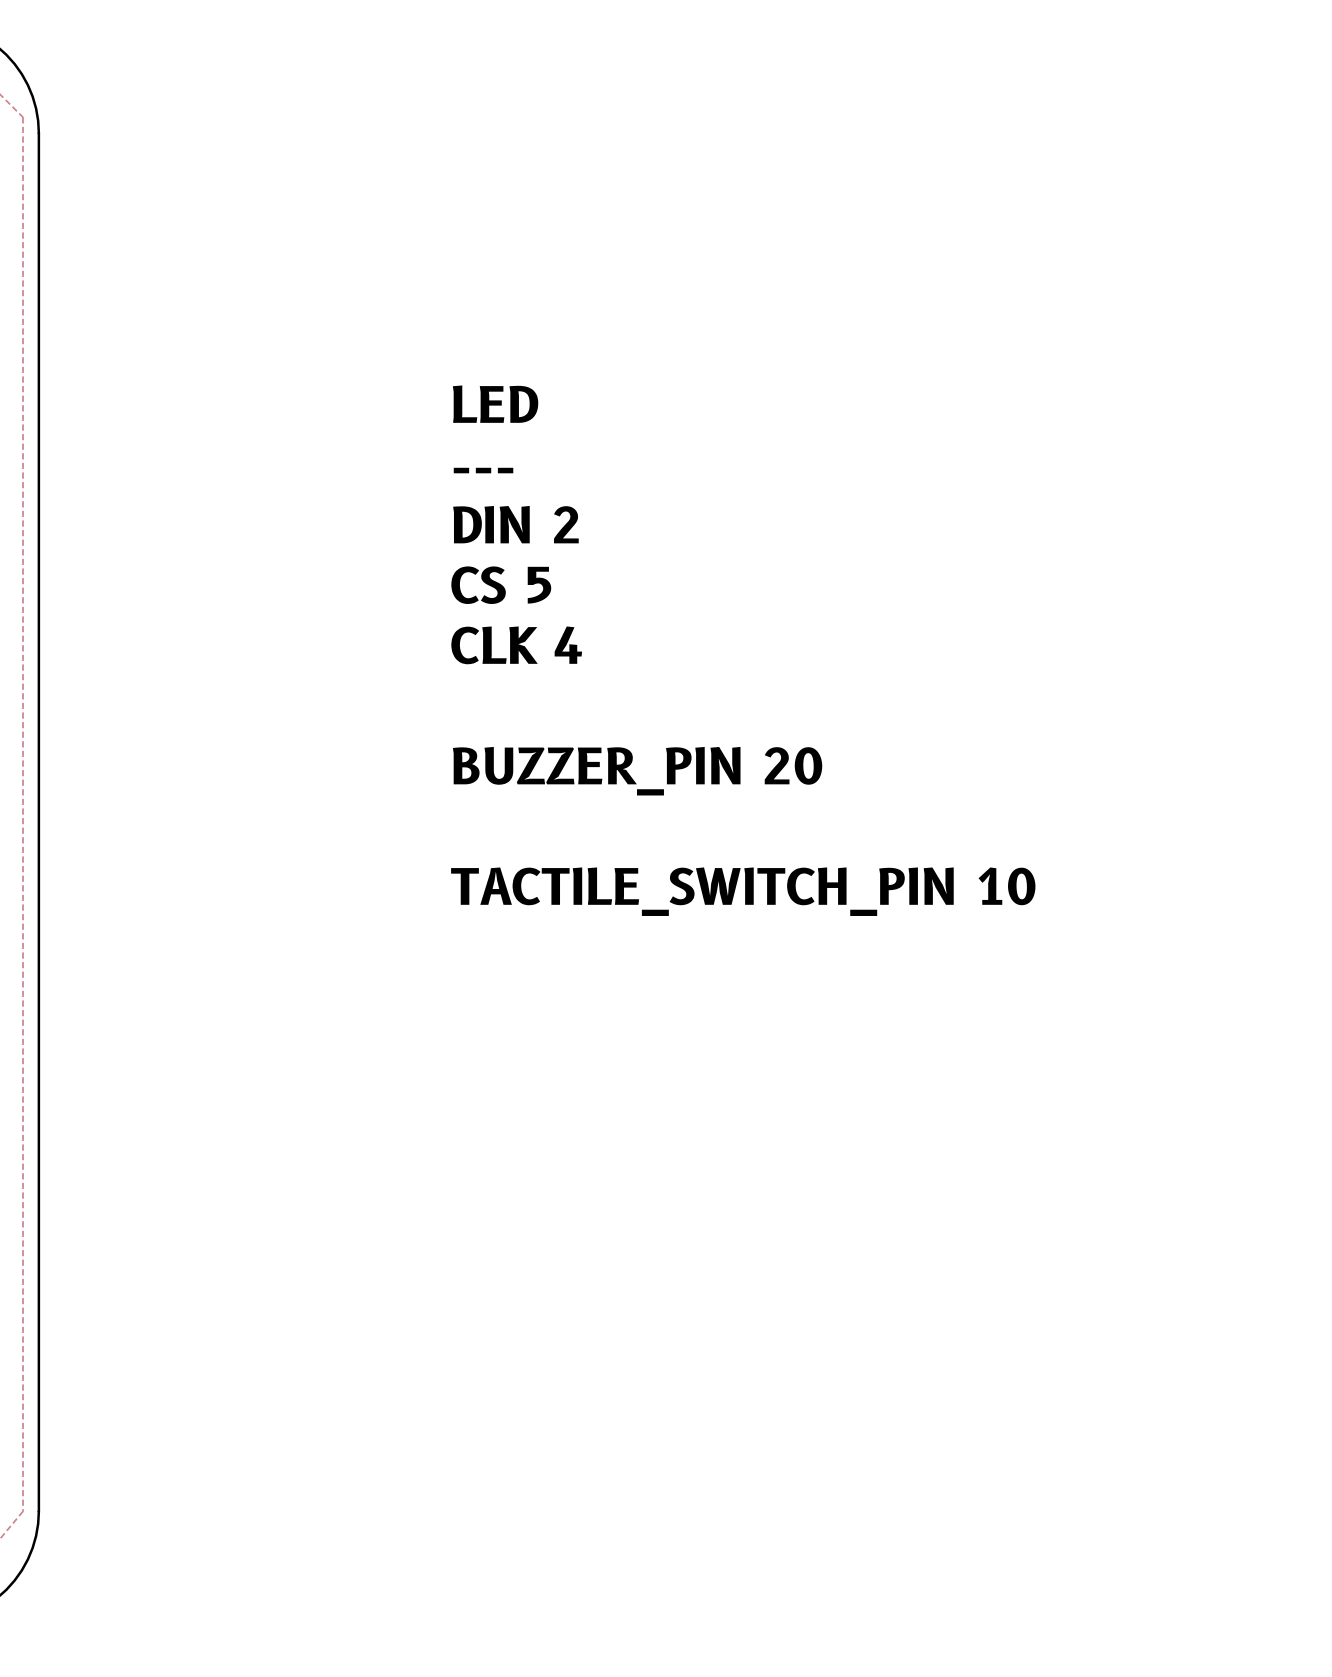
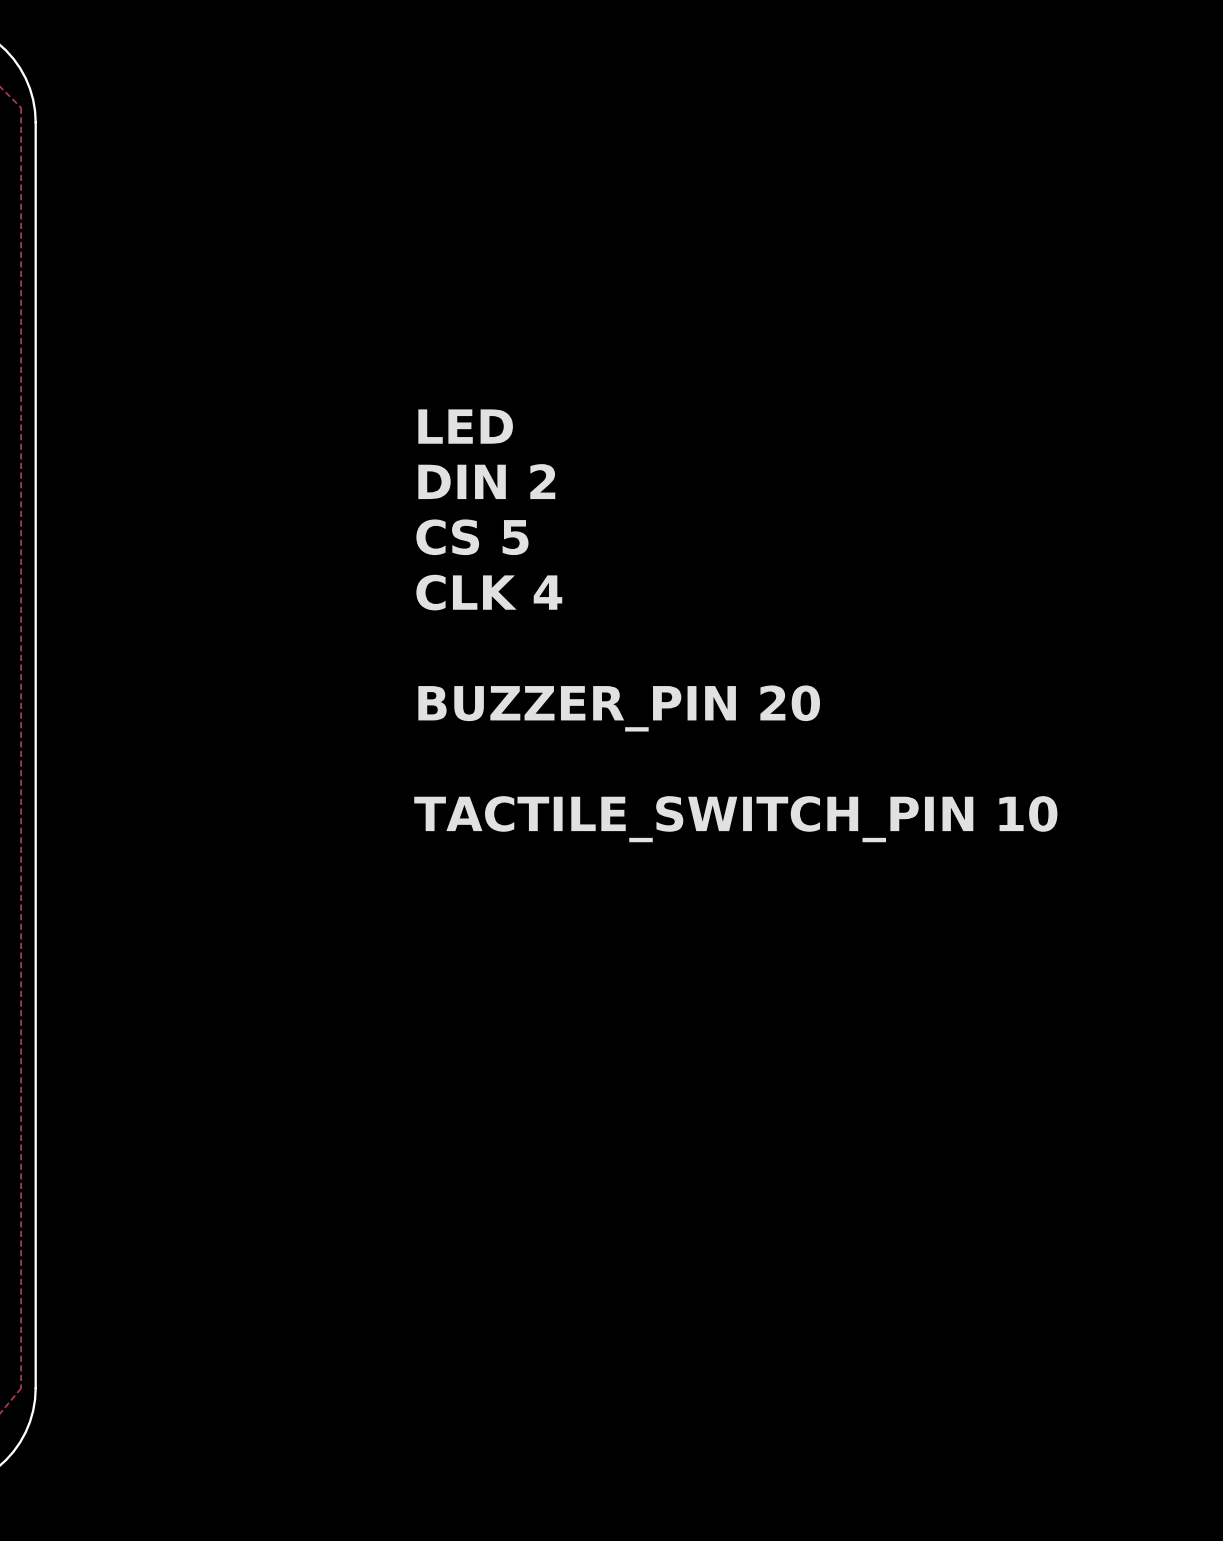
text: LED (495, 404) -> none
text: --- (483, 470) -> LED (465, 426)

